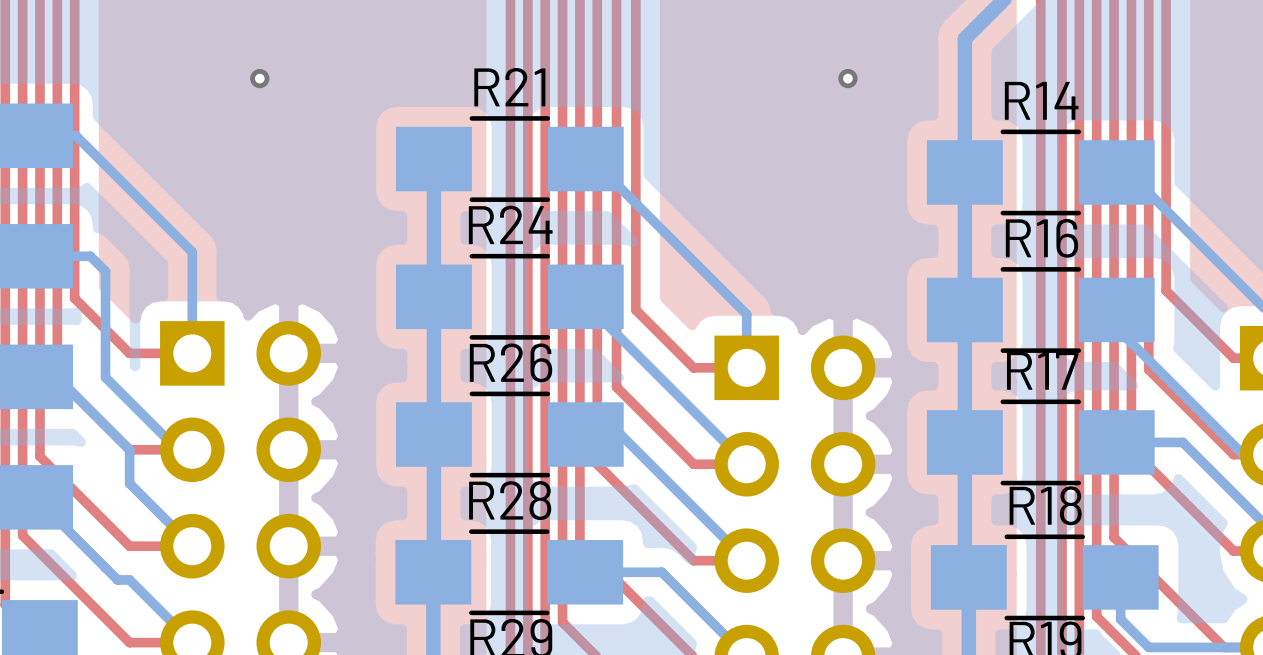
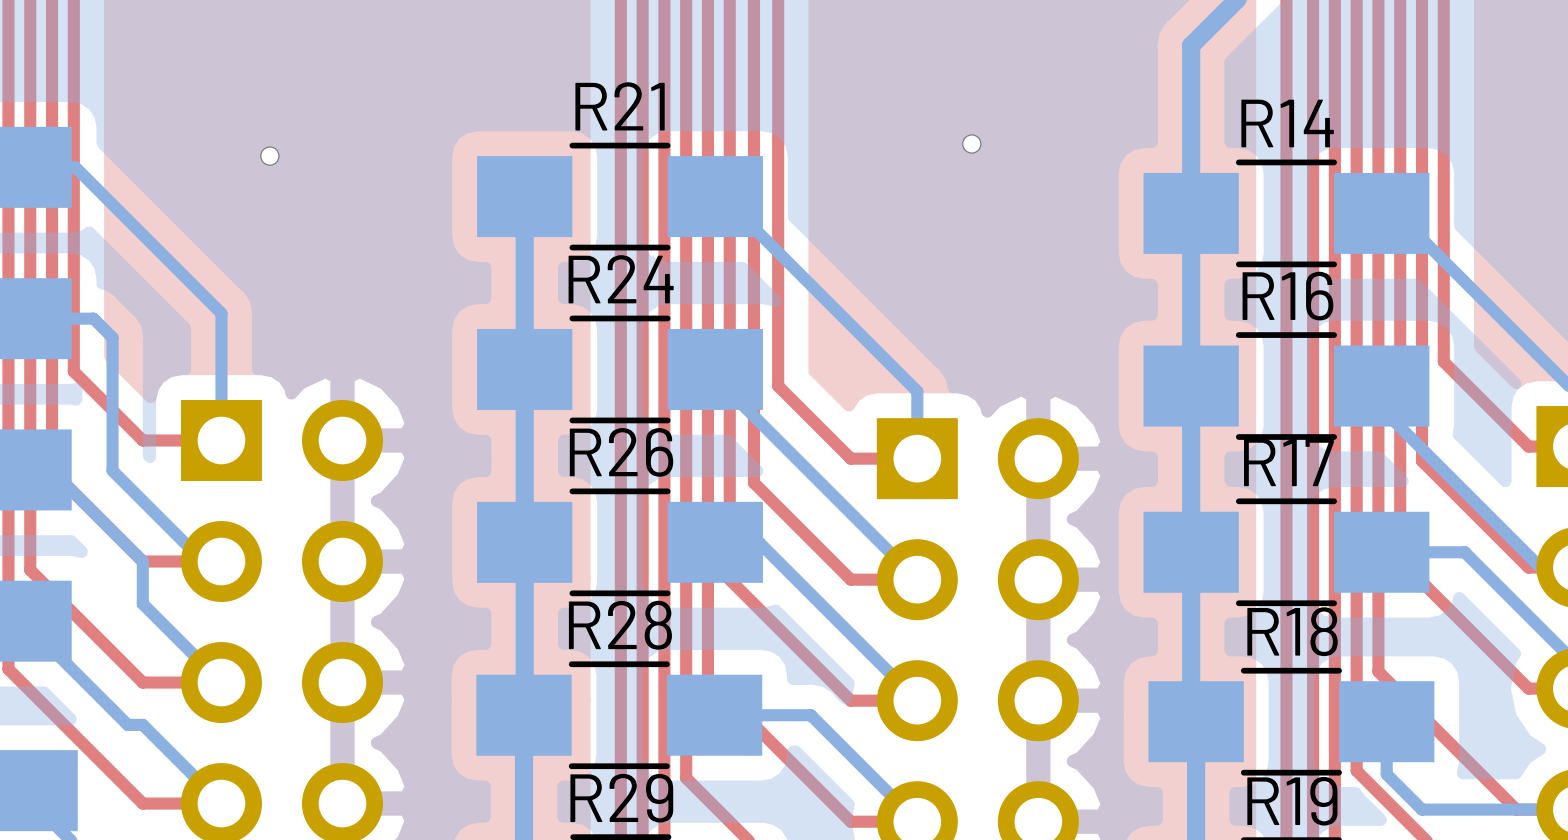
via: (259, 78) -> none
via: (847, 78) -> none
via: none -> (971, 143)
via: none -> (269, 156)

